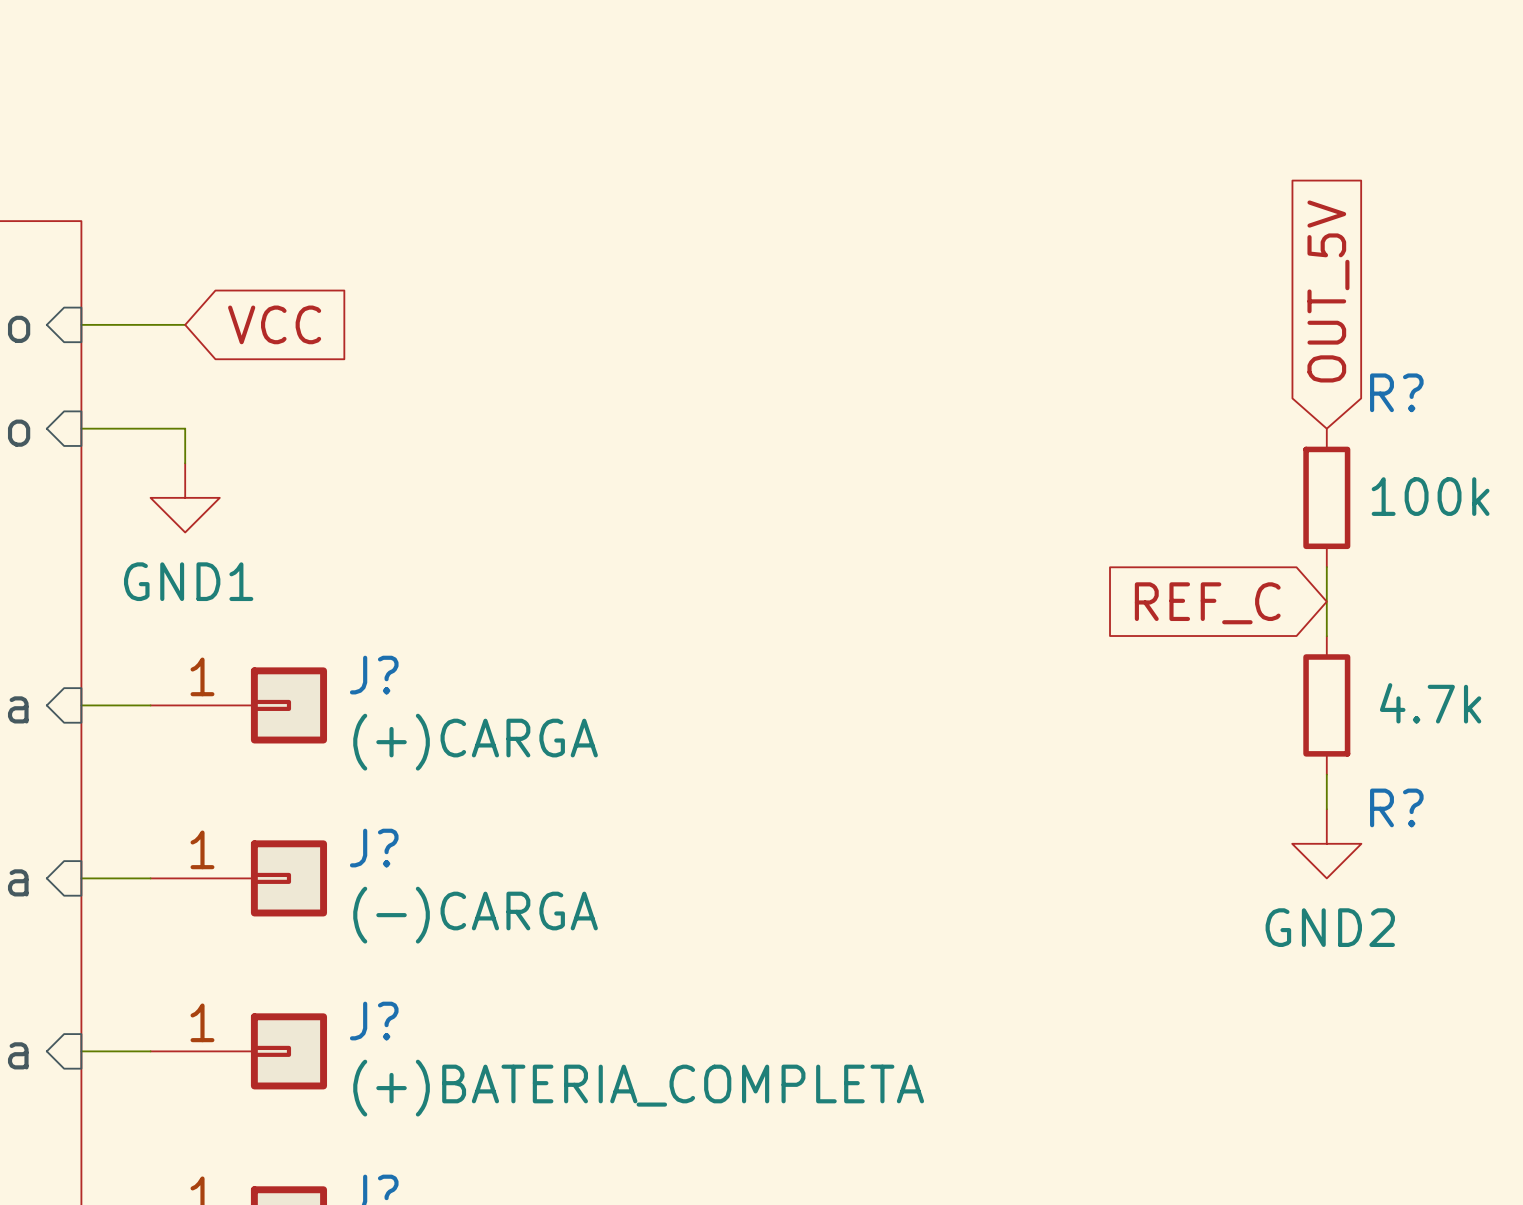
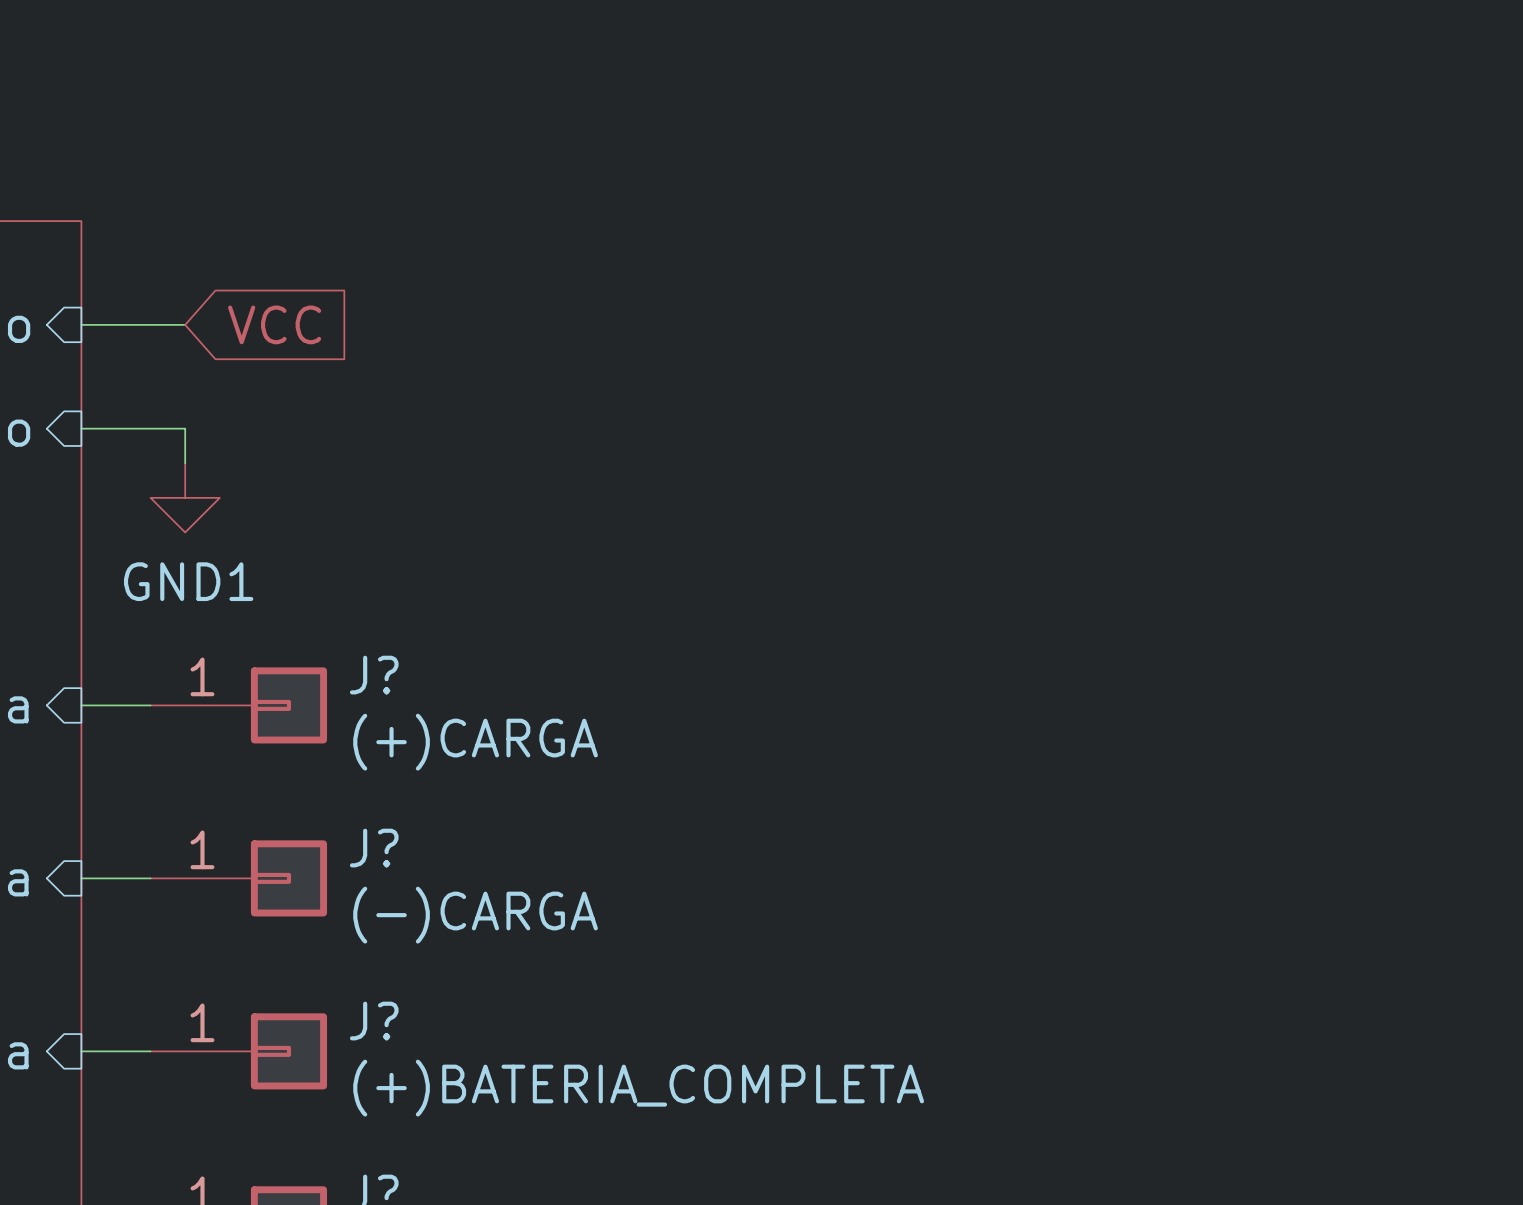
global label: OUT_5V (1328, 291) -> none
R?: 100k (1326, 497) -> none
wire: (1326, 567) (1326, 636) -> none
global label: REF_C (1207, 603) -> none
R?: 4.7k (1326, 705) -> none
wire: (1326, 774) (1326, 809) -> none
power symbol: GND2 (1326, 843) -> none

